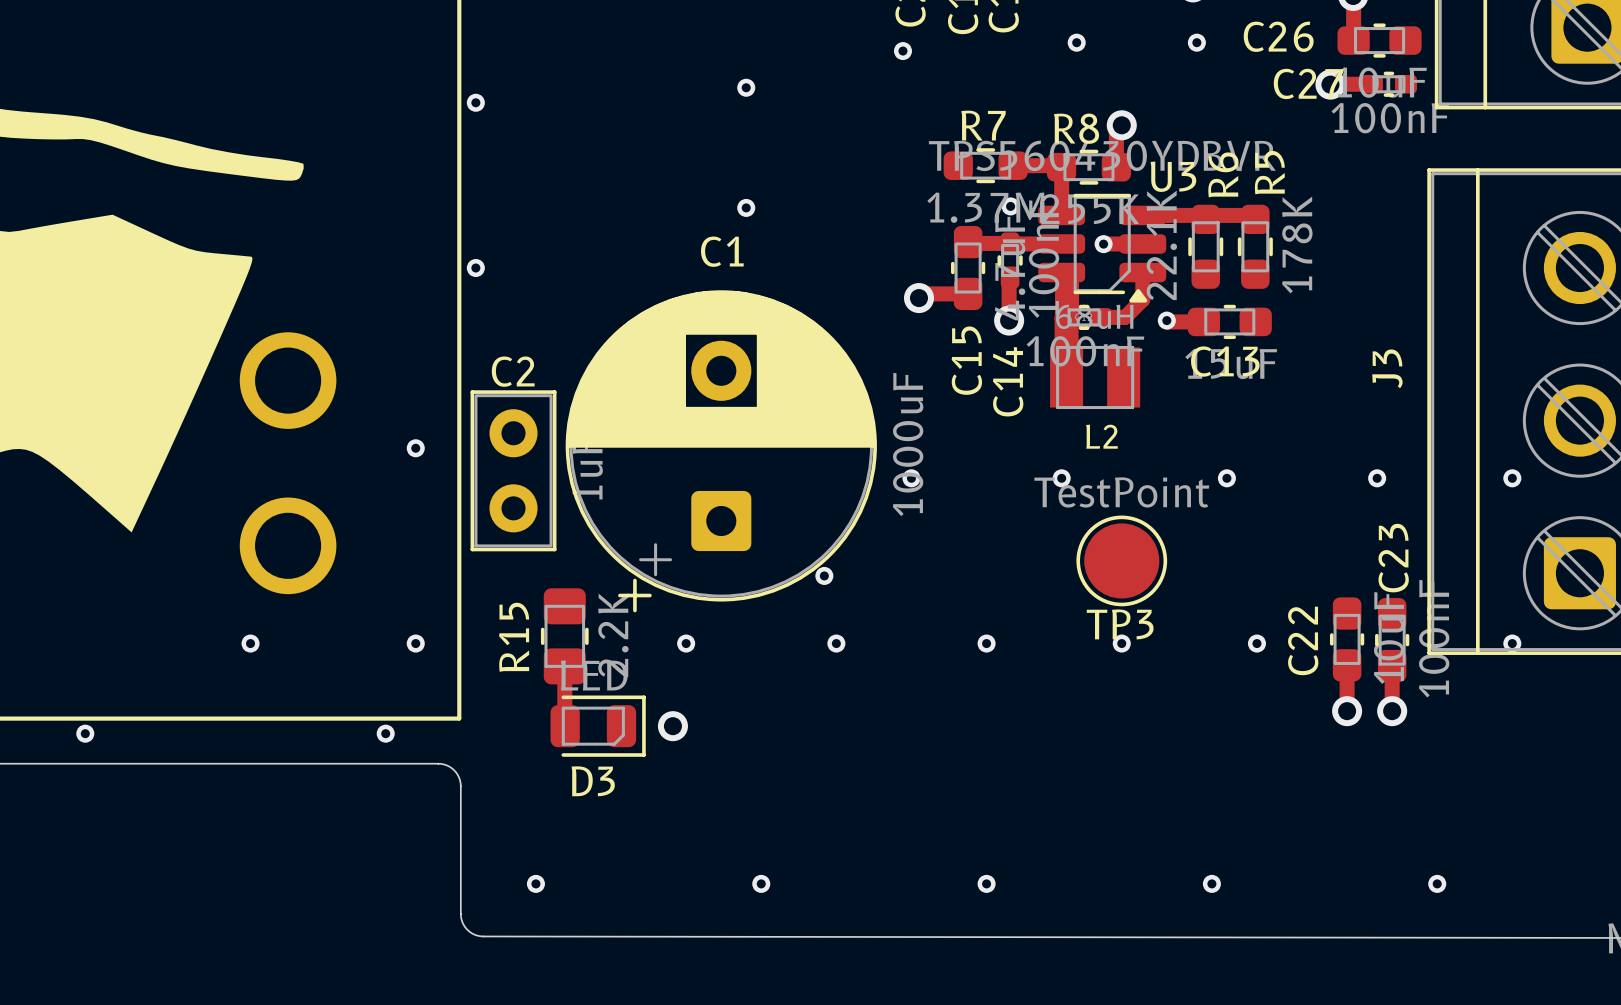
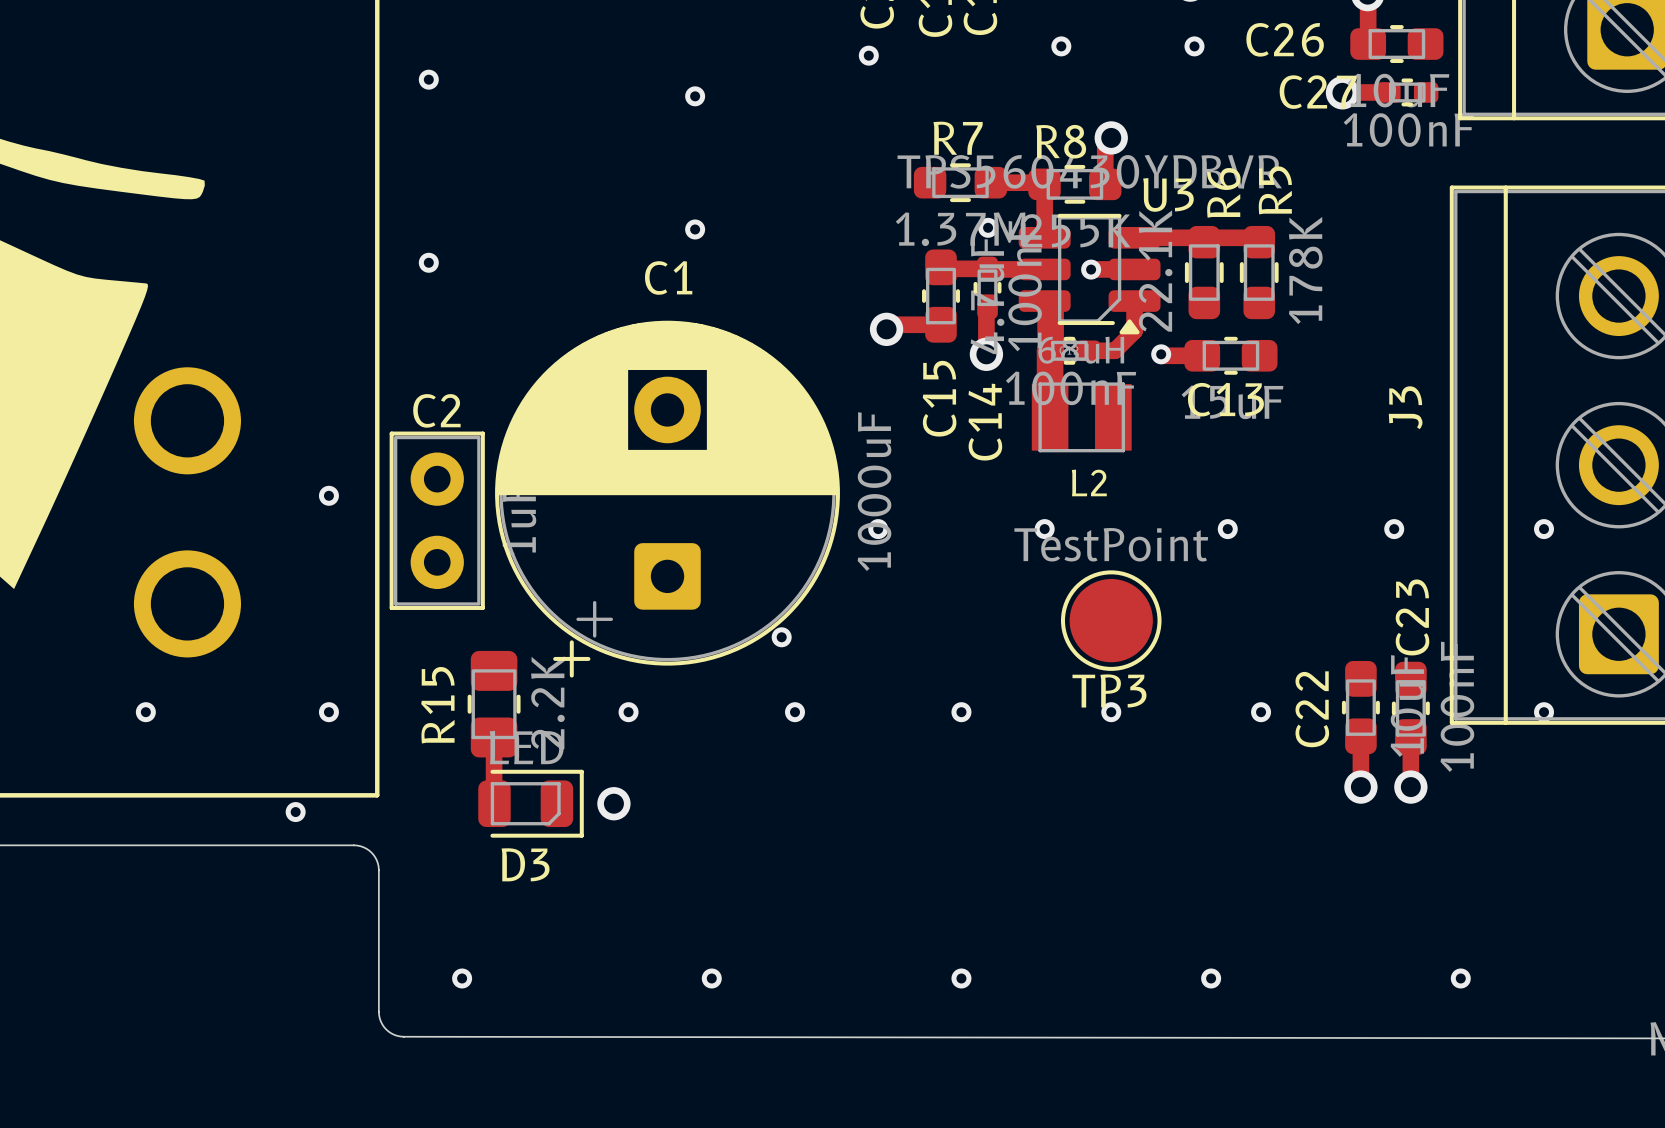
via position: (475, 102) -> (428, 79)
via position: (475, 268) -> (428, 262)

